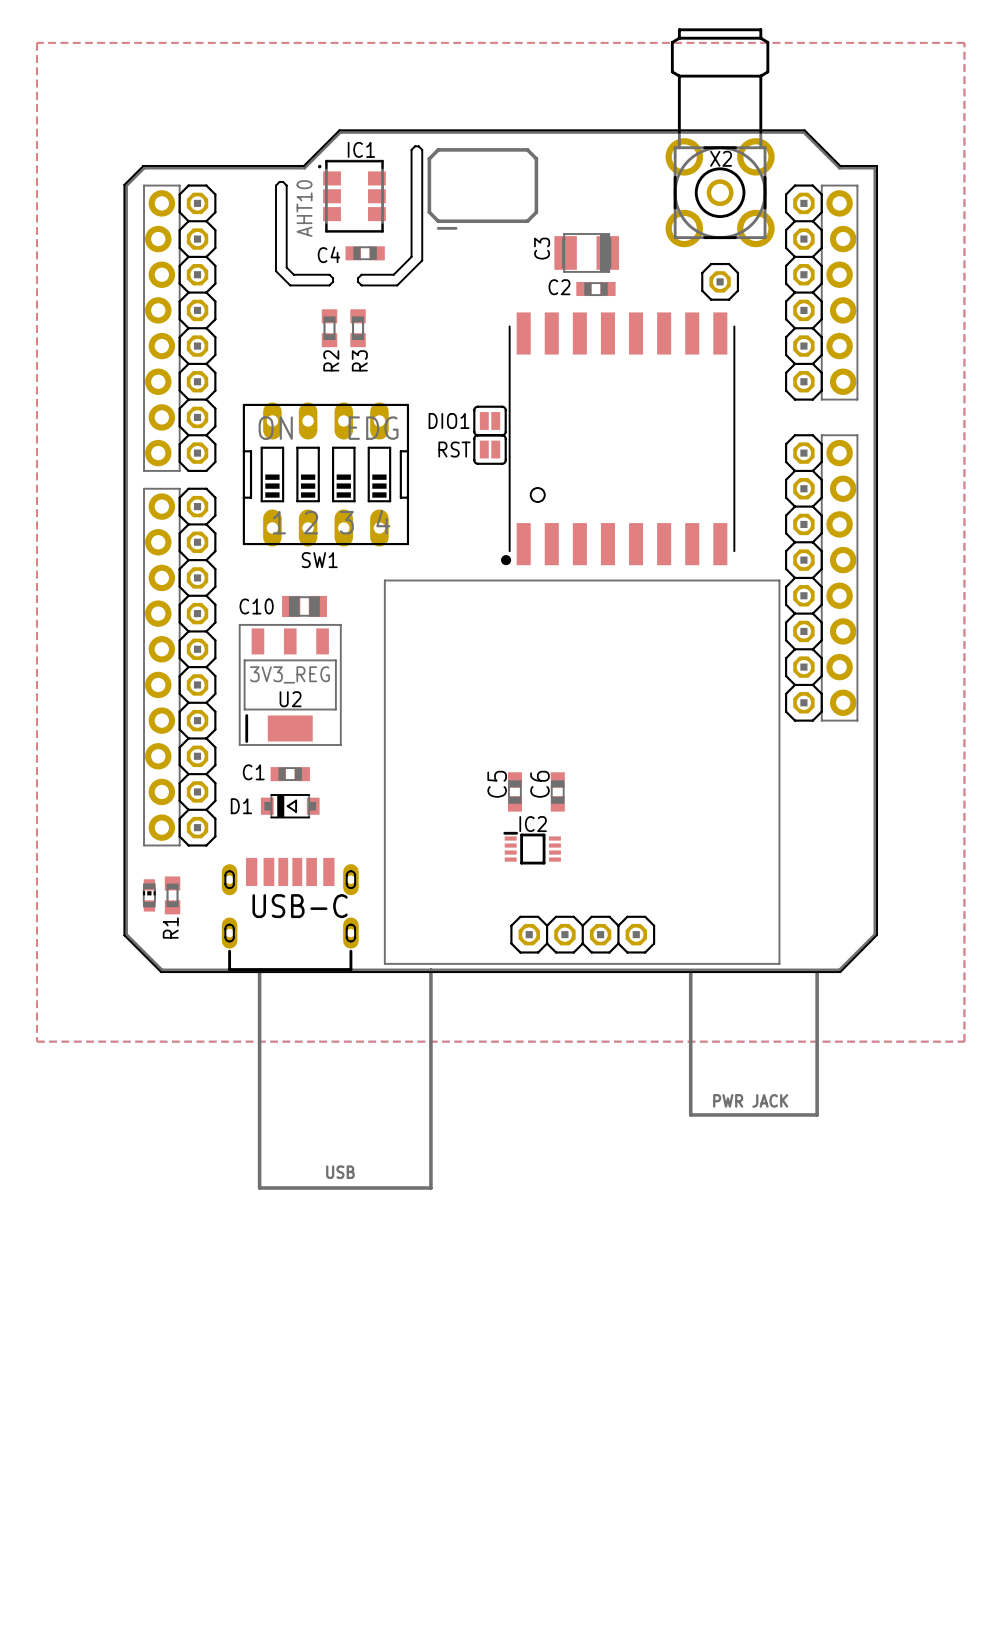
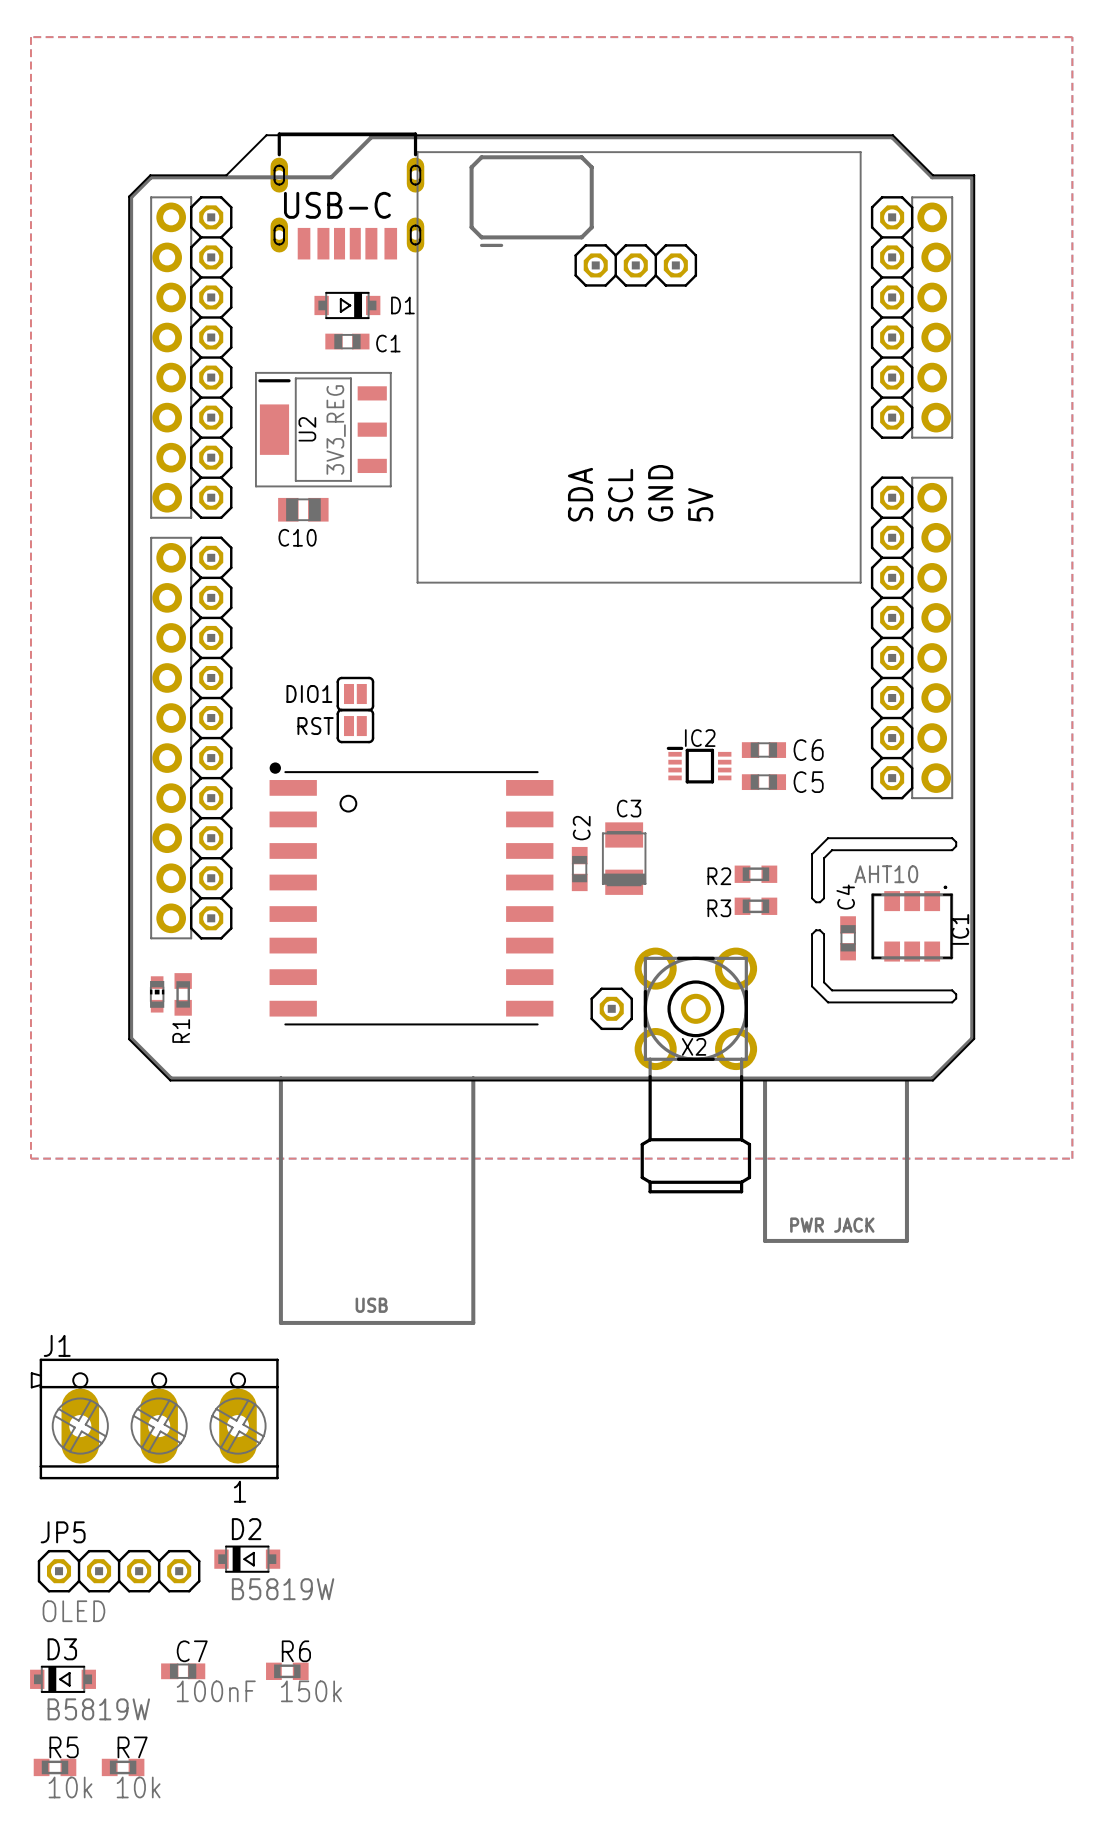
board edge: (339, 130) (303, 165) (211, 165) -> (370, 135) (266, 135) (226, 175)
X2 rotation: 0° (720, 137) -> 180° (695, 1070)
X2 position: (720, 137) -> (695, 1070)
line: none -> (417, 152) (417, 582) (860, 582) (860, 152) (417, 152)
board edge: (415, 146) (418, 146) (422, 149) (422, 260) (397, 285) (361, 285) (358, 281) (358, 278) (361, 274) (393, 274) (411, 256) (411, 149) (415, 146) -> none
board edge: (279, 181) (283, 181) (286, 185) (286, 267) (293, 274) (329, 274) (333, 278) (333, 281) (329, 285) (290, 285) (275, 271) (275, 185) (279, 181) -> none
part: none -> (347, 195)
text: none -> USB-C (337, 205)
IC1 rotation: 0° (352, 196) -> 90° clockwise (912, 923)
IC1 position: (352, 196) -> (912, 923)
part: none -> (635, 265)
C3 rotation: 0° (586, 252) -> 90° clockwise (624, 858)
C3 position: (586, 252) -> (624, 858)
C4 rotation: 0° (365, 253) -> 90° clockwise (848, 938)
C4 position: (365, 253) -> (848, 938)
part: (720, 281) -> none
C2 rotation: 0° (595, 289) -> 90° clockwise (579, 869)
C2 position: (595, 289) -> (579, 869)
R2 rotation: 0° (329, 328) -> 90° clockwise (755, 874)
R2 position: (329, 328) -> (755, 874)
R3 rotation: 0° (358, 328) -> 90° clockwise (755, 906)
R3 position: (358, 328) -> (755, 906)
text position: DIO1 (449, 420) -> DIO1 (309, 694)
part: (490, 420) -> none
part: (618, 438) -> none
text position: RST (454, 449) -> RST (315, 726)
part: (490, 449) -> none
text: none -> GND (660, 493)
text: none -> SDA (580, 494)
text: none -> SCL (620, 495)
text: none -> 5V (700, 504)
SW1: (325, 474) -> none
line: (384, 580) (384, 963) (779, 963) (779, 580) (384, 580) -> none
C10 name position: C10 (256, 606) -> C10 (297, 537)
C10 position: (304, 606) -> (303, 509)
part: none -> (355, 694)
part: none -> (355, 726)
U2 rotation: 0° (290, 684) -> 90° clockwise (323, 429)
U2 position: (290, 684) -> (323, 429)
board edge: none -> (828, 838) (952, 838) (956, 842) (956, 846) (952, 850) (832, 850) (824, 858) (824, 898) (820, 902) (816, 902) (812, 898) (812, 854) (828, 838)
C1 name position: C1 (253, 772) -> C1 (388, 343)
C1 position: (290, 774) -> (347, 341)
C5 name position: C5 (497, 784) -> C5 (808, 782)
C6 name position: C6 (539, 784) -> C6 (808, 750)
C5 rotation: 0° (514, 791) -> 90° clockwise (763, 782)
C5 position: (514, 791) -> (763, 782)
C6 rotation: 0° (557, 791) -> 90° clockwise (763, 750)
C6 position: (557, 791) -> (763, 750)
part: none -> (411, 893)
D1 rotation: 0° (290, 806) -> 180° (347, 305)
D1 position: (290, 806) -> (347, 305)
board edge: none -> (816, 930) (812, 934) (812, 986) (828, 1002) (952, 1002) (956, 998) (956, 994) (952, 990) (832, 990) (824, 982) (824, 934) (820, 930) (816, 930)
IC2 position: (532, 848) -> (699, 765)
text: USB-C (300, 906) -> none
part: none -> (611, 1008)
part: (290, 914) -> none
part: (582, 934) -> none
J1: none -> (154, 1418)
D2: none -> B5819W (247, 1559)
JP5: none -> OLED (119, 1571)
C7: none -> 100nF (183, 1671)
R6: none -> 150k (287, 1671)
D3: none -> B5819W (63, 1679)
R5: none -> 10k (55, 1767)
R7: none -> 10k (123, 1767)

